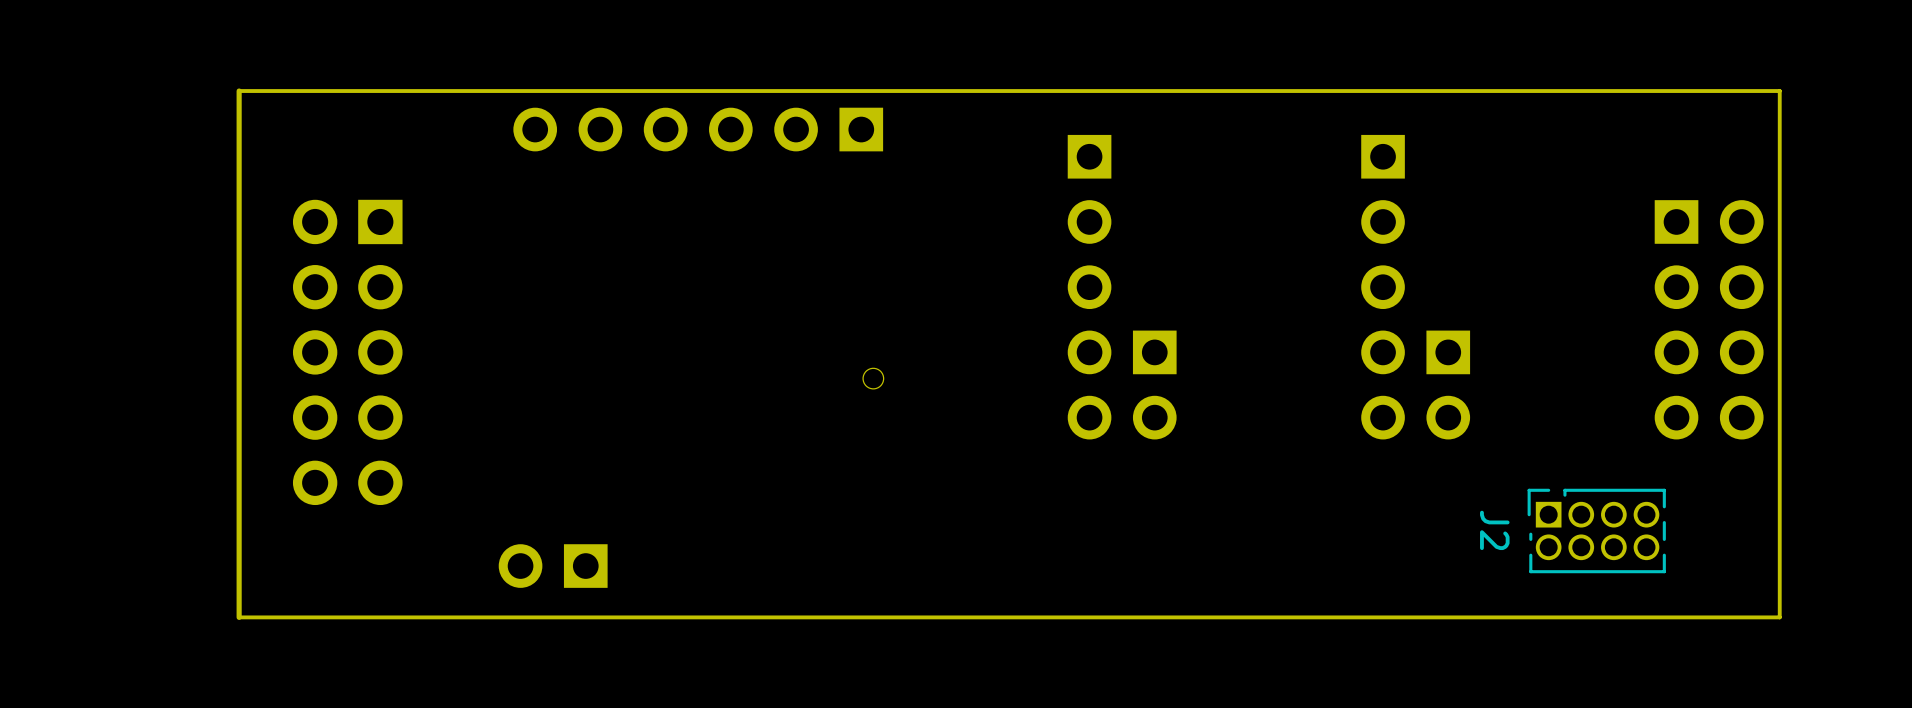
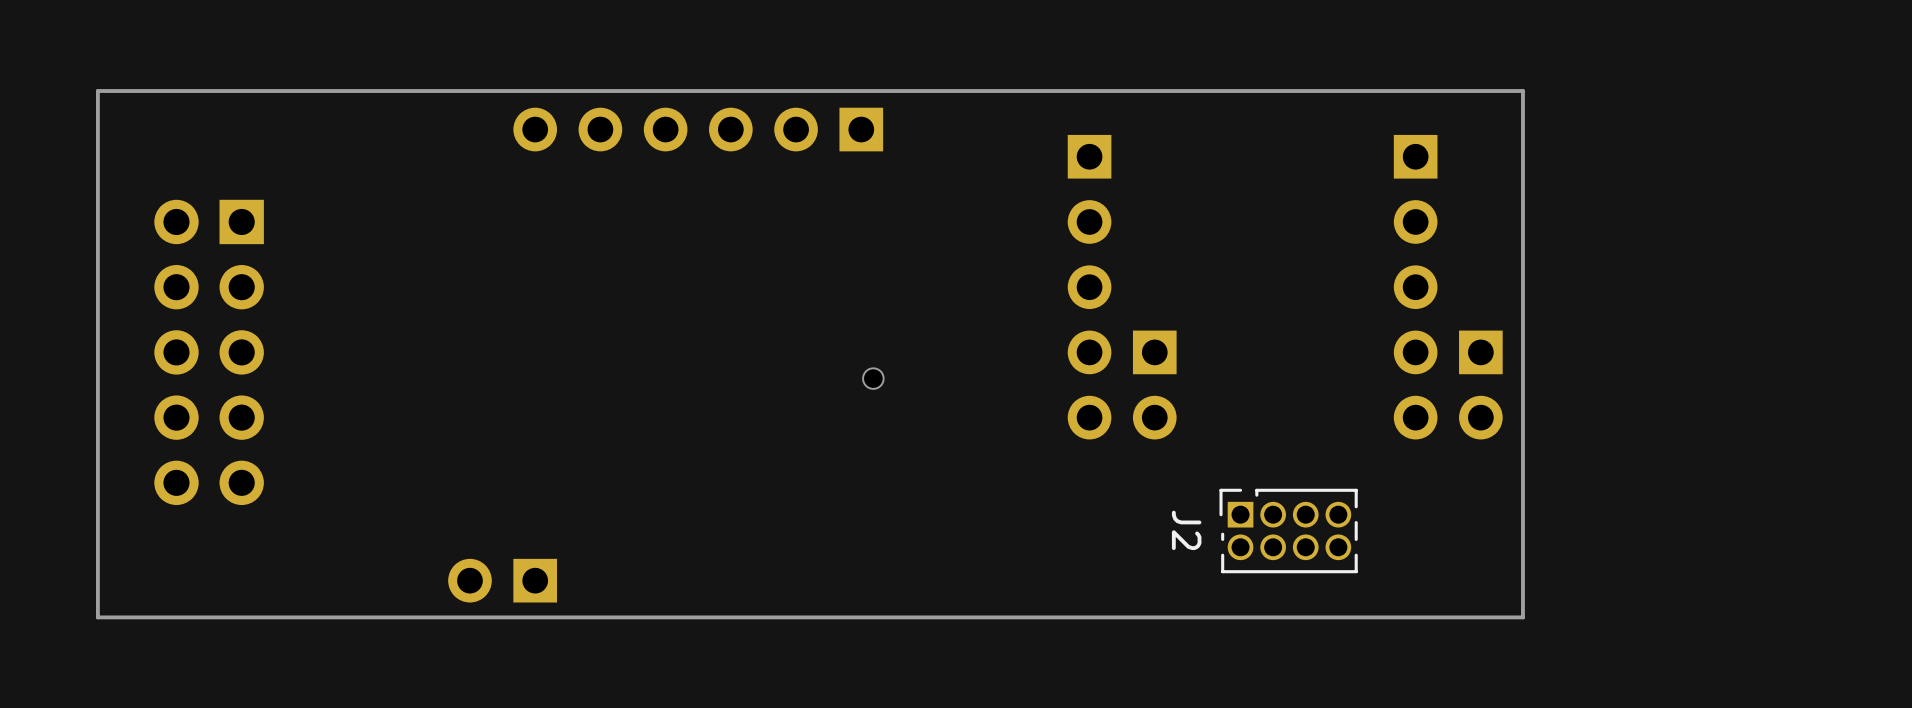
board edge: (239, 91) (239, 617) -> (239, 91) (97, 91) (97, 617) (239, 617)
board edge: (1522, 91) (1779, 91) (1779, 617) (1522, 617) -> (1522, 91) (1522, 617)
part position: (1383, 287) -> (1415, 287)
part: (1709, 319) -> none
part position: (347, 352) -> (209, 352)
part position: (1448, 385) -> (1480, 385)
J2 position: (1596, 530) -> (1288, 530)
part position: (553, 566) -> (502, 580)

